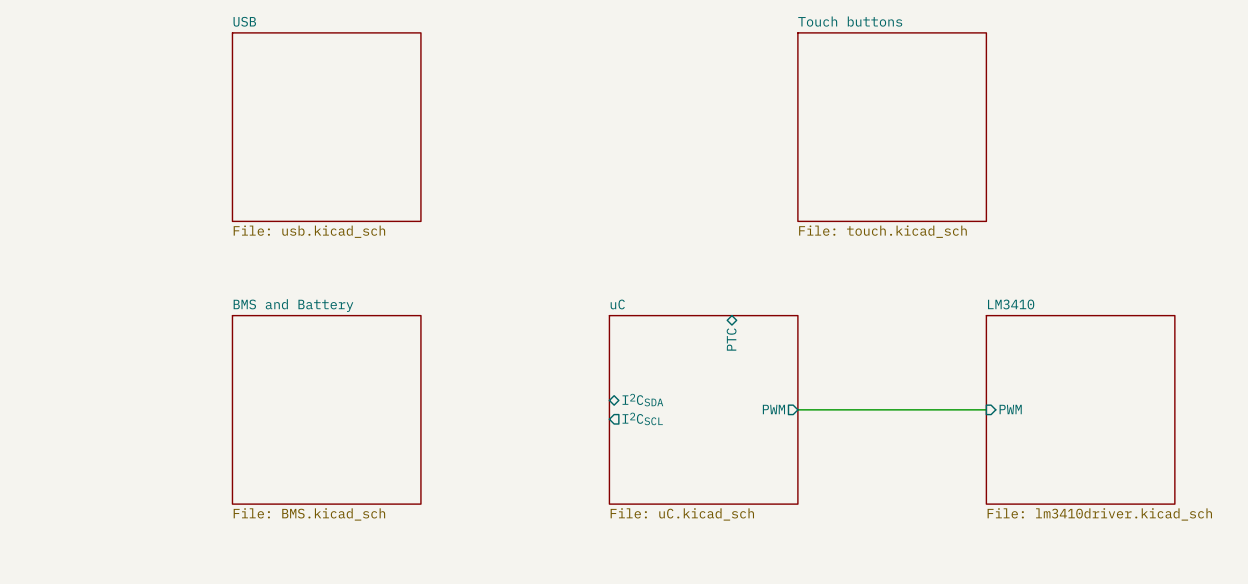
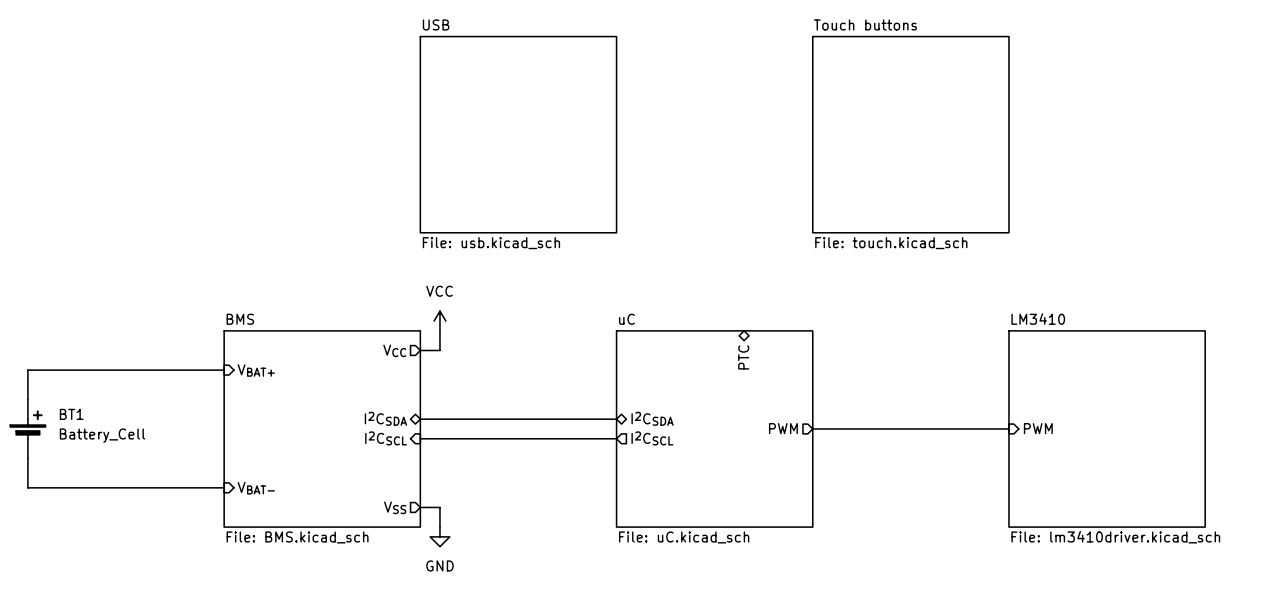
sheet USB: File: usb.kicad_sch (326, 127) -> none
sheet USB: none -> File: usb.kicad_sch (518, 134)
sheet BMS and Battery name: BMS and Battery (293, 305) -> BMS (240, 319)
power symbol: none -> VCC (439, 321)
wire: none -> (439, 330) (439, 350) (420, 350)
sheet pin: none -> VCC (394, 350)
wire: none -> (224, 370) (27, 370) (27, 399)
sheet pin: none -> VBAT+ (256, 370)
sheet pin: none -> I2CSDA (385, 418)
wire: none -> (420, 419) (616, 419)
BT1: none -> Battery_Cell (27, 428)
sheet pin: none -> I2CSCL (386, 438)
wire: none -> (420, 438) (616, 438)
wire: none -> (27, 458) (27, 487) (224, 487)
sheet pin: none -> VBAT- (256, 488)
sheet pin: none -> VSS (395, 507)
wire: none -> (420, 507) (439, 507) (439, 527)
power symbol: none -> GND (439, 536)

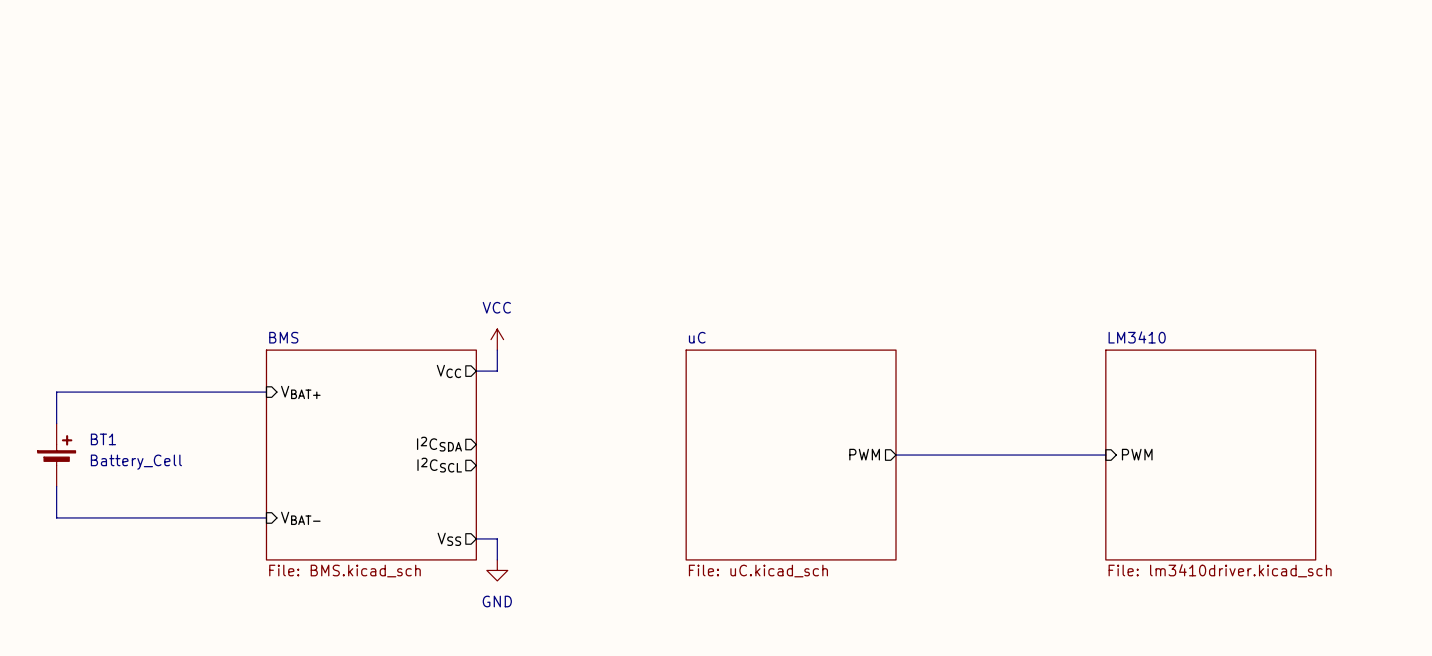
sheet USB: File: usb.kicad_sch (518, 134) -> none
sheet Touch buttons: File: touch.kicad_sch (910, 134) -> none
sheet pin: PTC (743, 357) -> none
sheet pin shape: bidirectional (385, 418) -> output (439, 444)
sheet pin: I2CSDA (652, 418) -> none
wire: (420, 419) (616, 419) -> none
sheet pin shape: input (386, 438) -> output (439, 465)
wire: (420, 438) (616, 438) -> none
sheet pin: I2CSCL (652, 438) -> none

